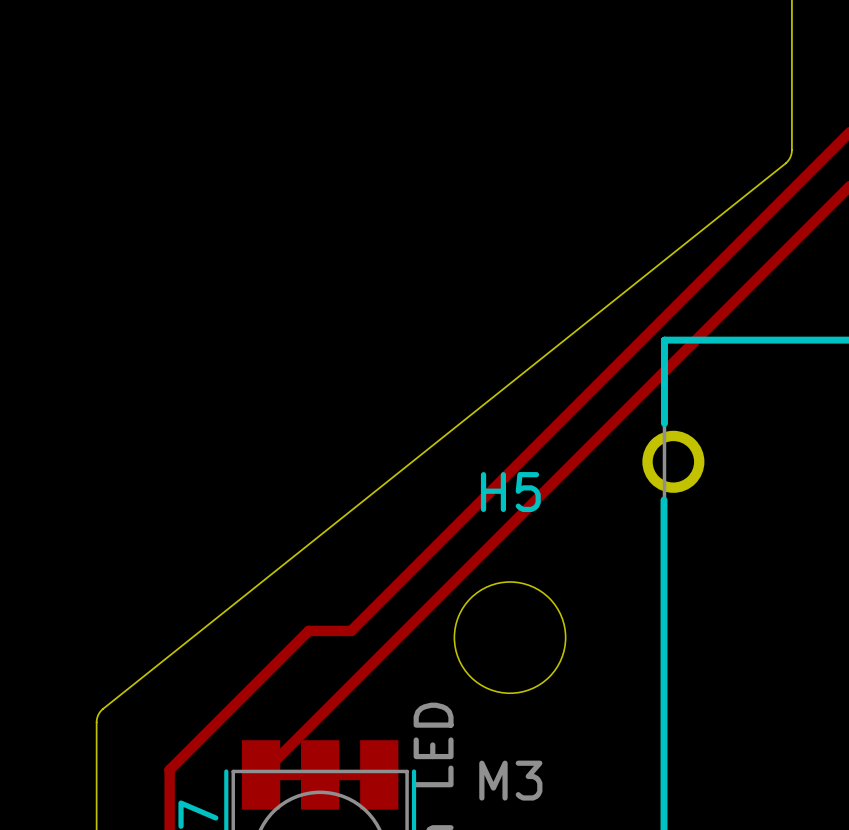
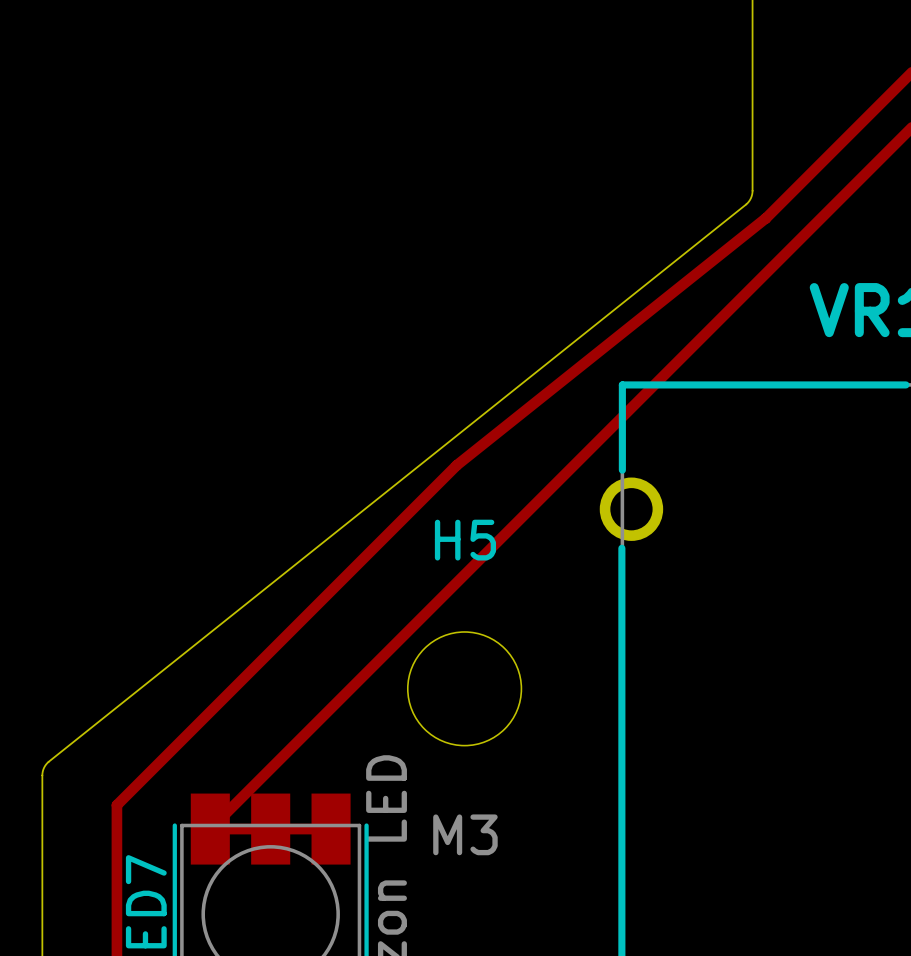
top track: (804, 177) (351, 630) (308, 630) (169, 770) -> (765, 218) (456, 465) (116, 805) (116, 824)

